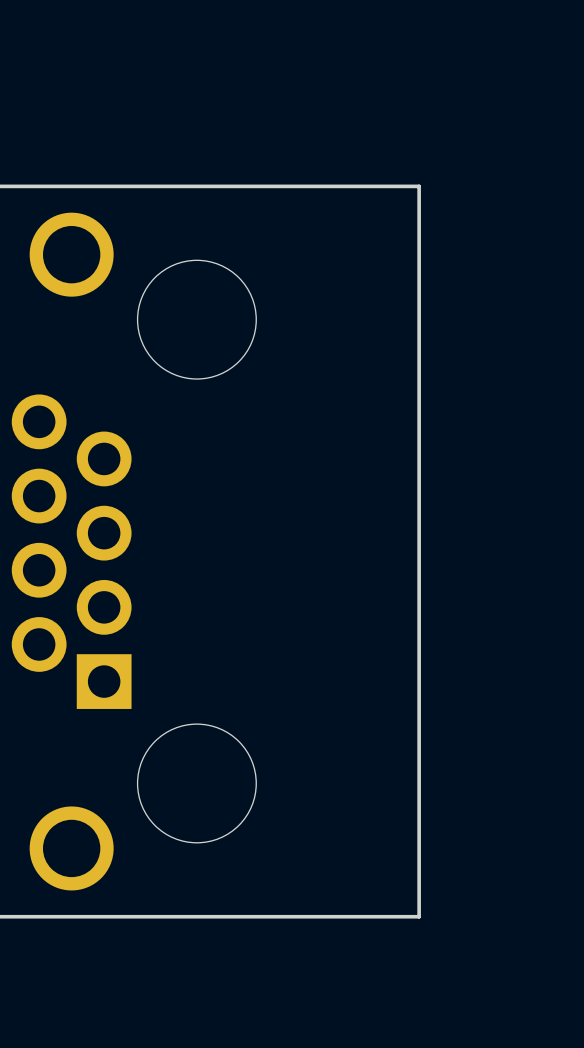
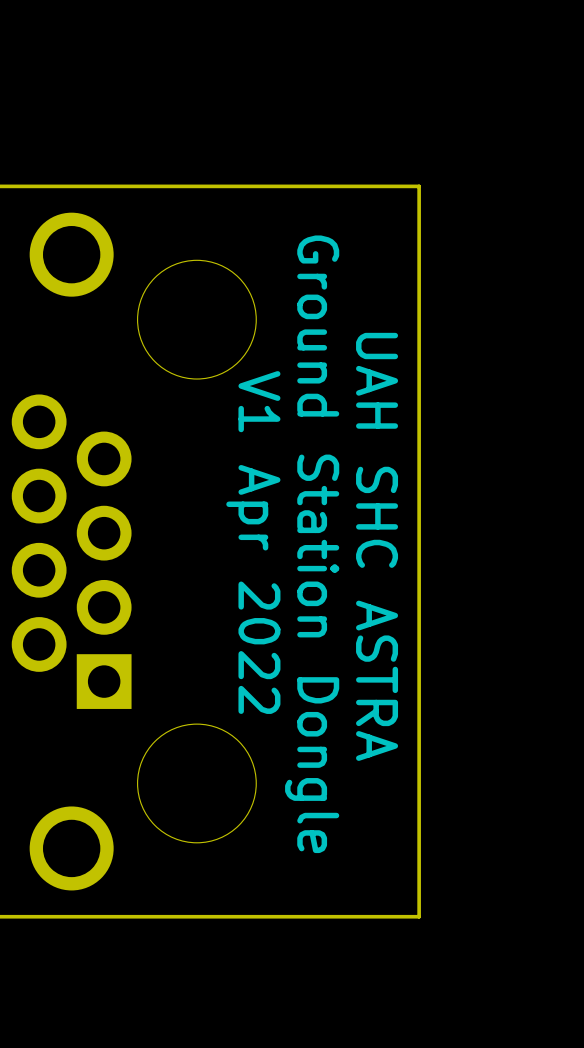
text: none -> V1 Apr 2022 (253, 542)
text: none -> Ground Station Dongle (312, 544)
text: none -> UAH SHC ASTRA (377, 546)

